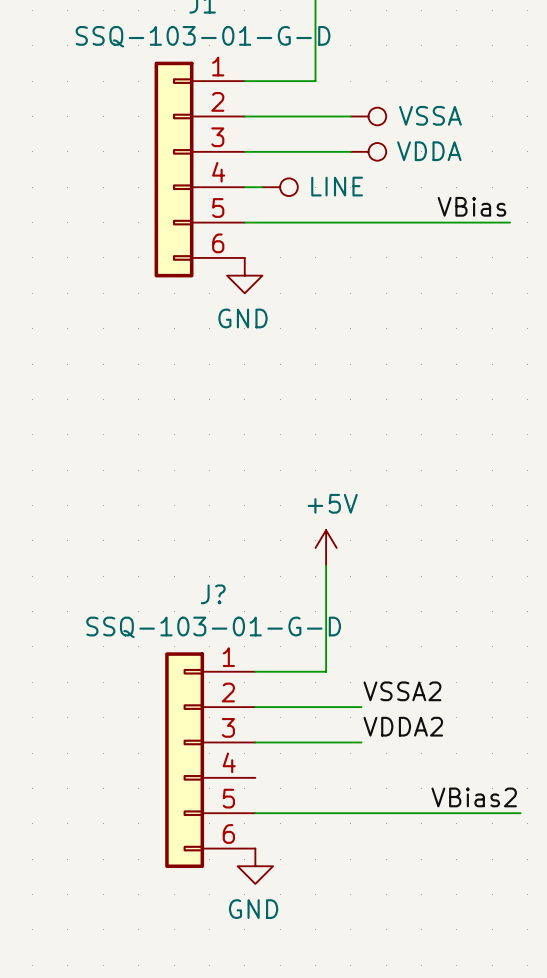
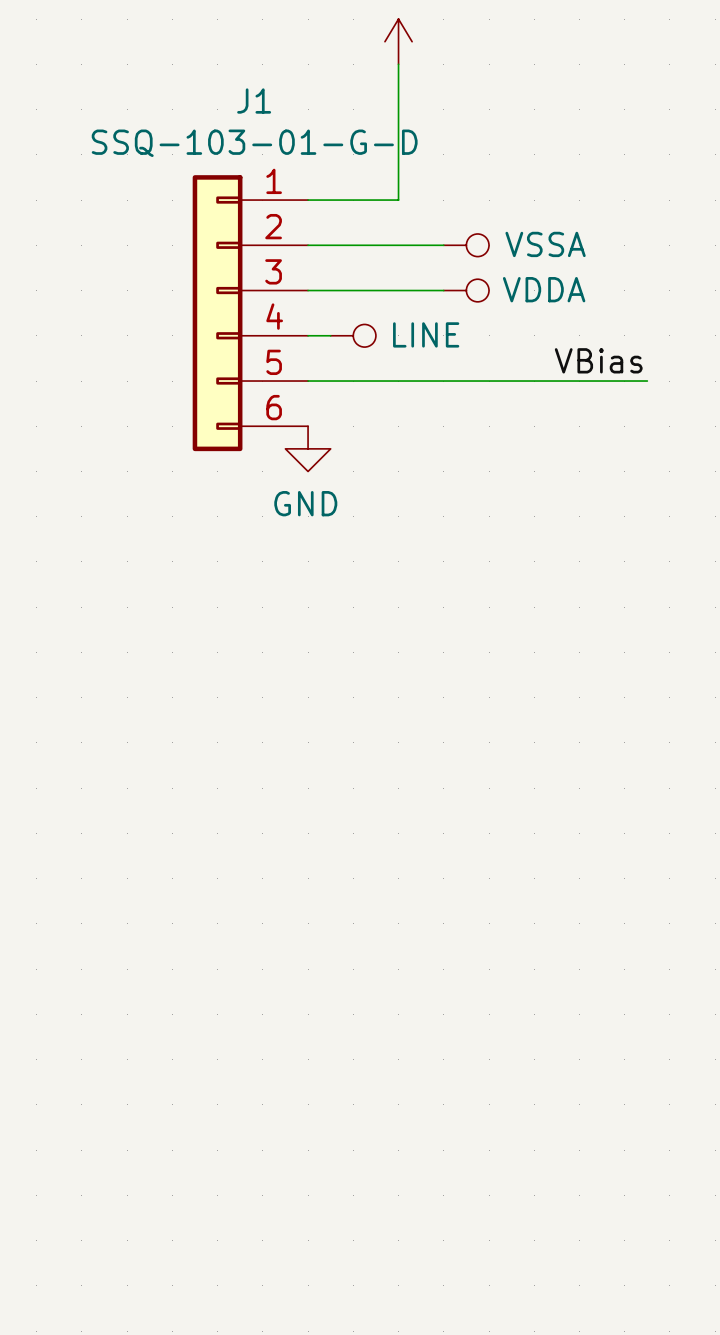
power symbol: +5V (326, 547) -> none
wire: (326, 565) (326, 671) (255, 671) -> none
label: VSSA2 (402, 691) -> none
wire: (255, 707) (361, 707) -> none
label: VDDA2 (403, 726) -> none
wire: (255, 742) (361, 742) -> none
J?: SSQ-103-01-G-D (210, 760) -> none
label: VBias2 (474, 797) -> none
wire: (255, 813) (520, 813) -> none
power symbol: GND (255, 866) -> none

